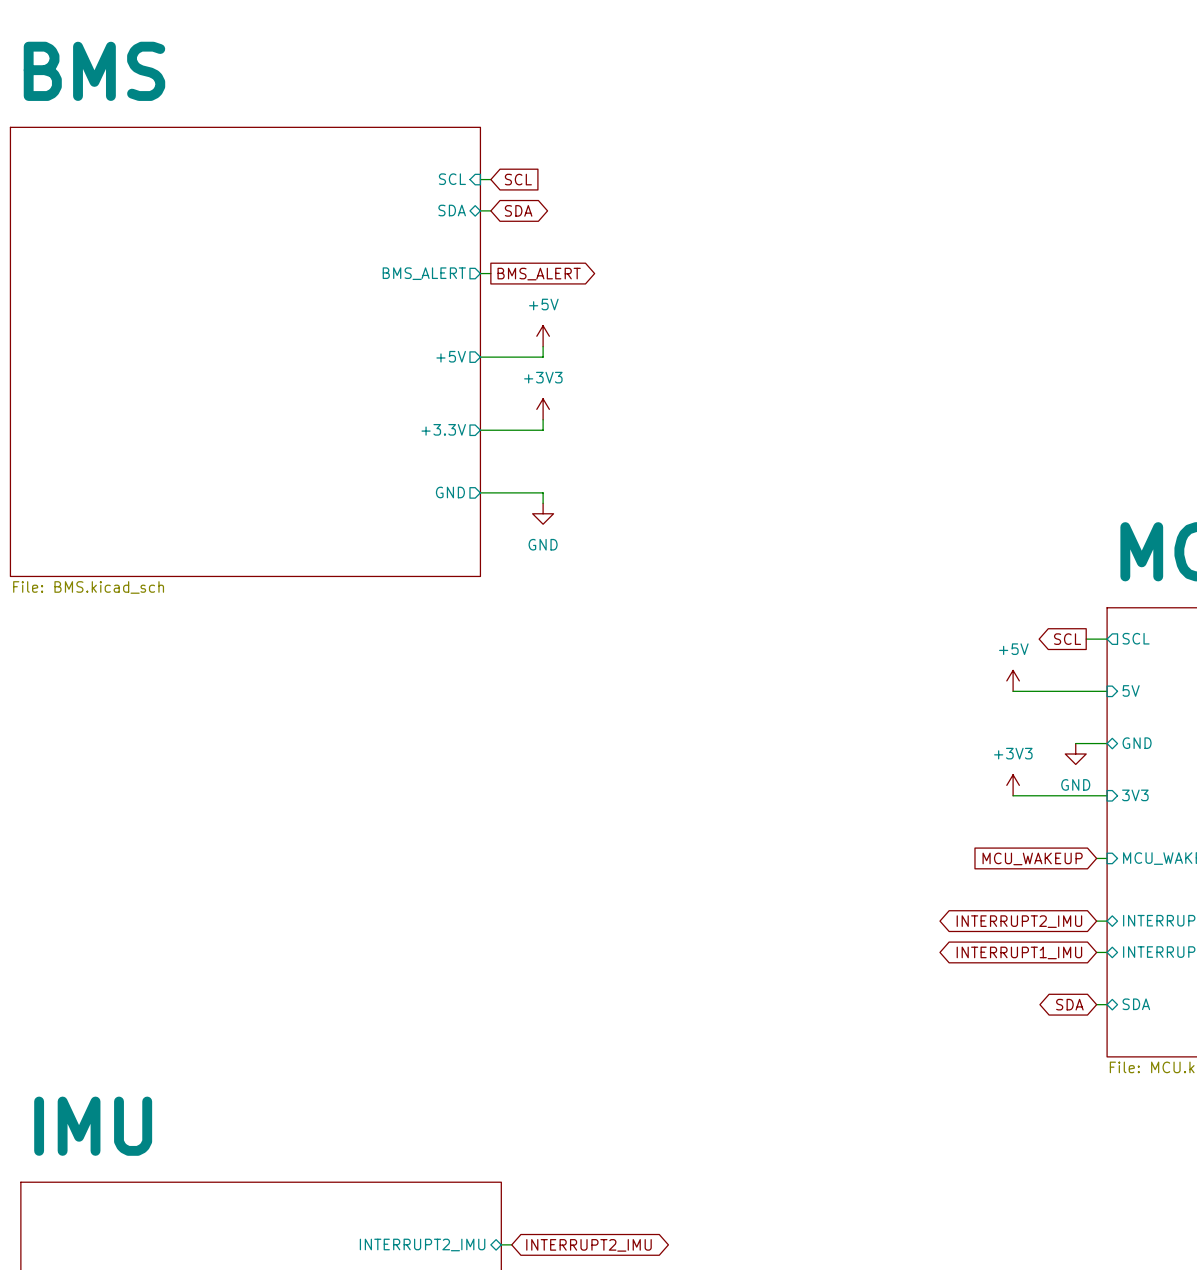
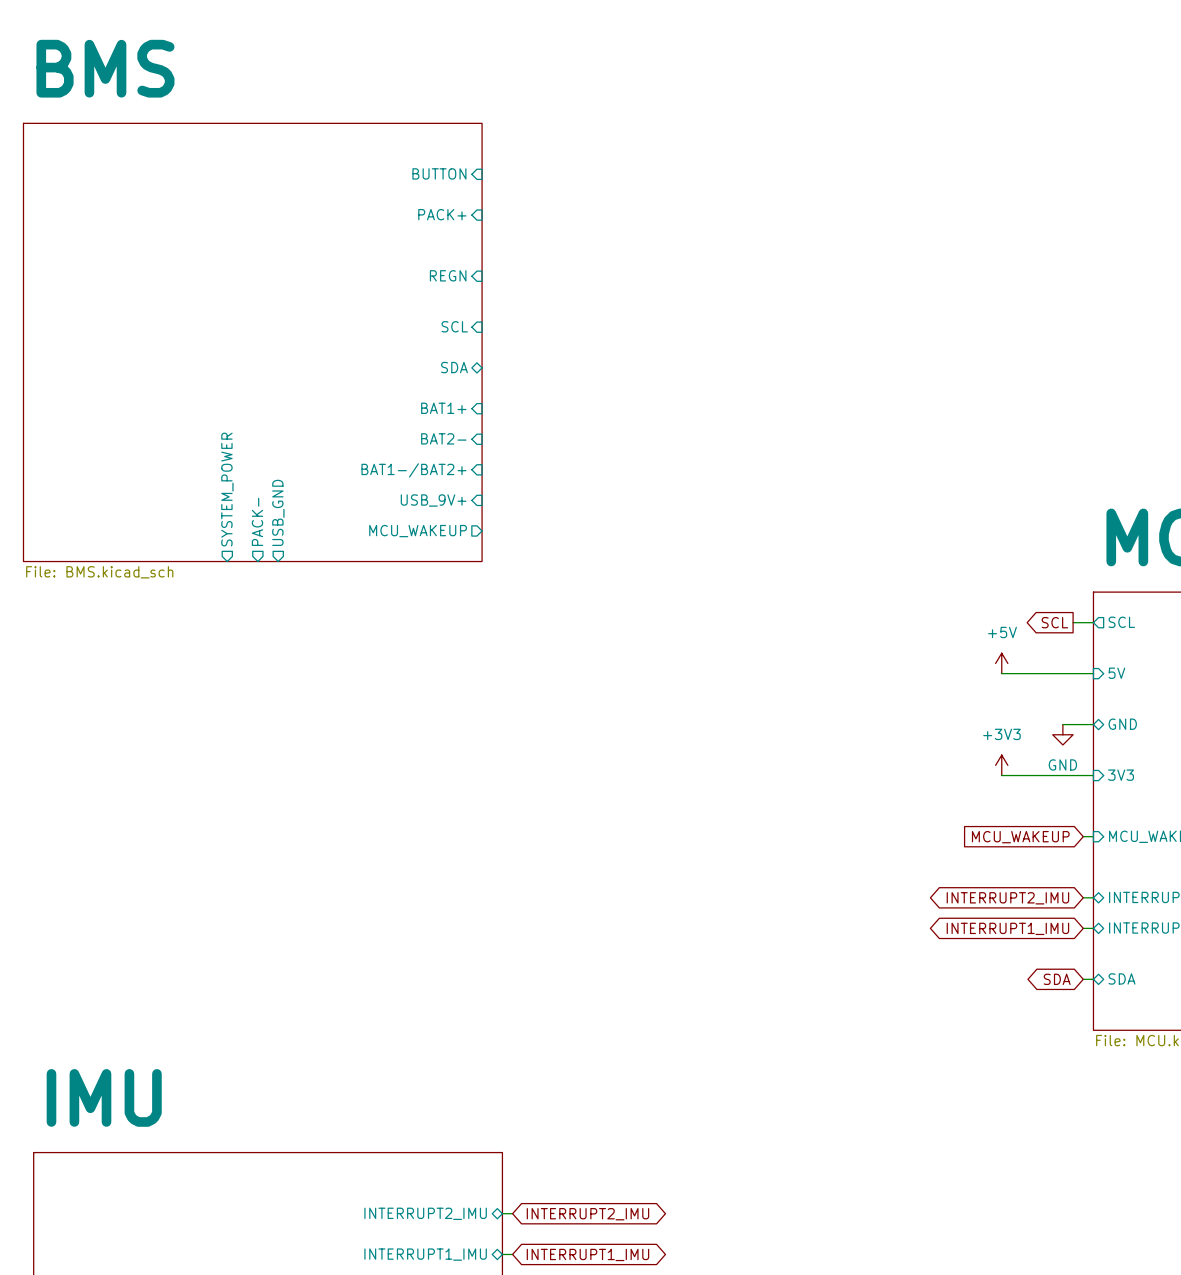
sheet pin: SCL (452, 179) -> BUTTON (439, 173)
wire: (480, 179) (490, 179) -> none
global label: SCL (518, 179) -> none
sheet pin position: SDA (452, 210) -> SDA (454, 367)
wire: (480, 210) (490, 210) -> none
global label: SDA (518, 210) -> none
sheet pin: none -> PACK+ (442, 214)
sheet pin: BMS_ALERT (424, 273) -> none
wire: (480, 273) (490, 273) -> none
global label: BMS_ALERT (539, 274) -> none
sheet pin: none -> REGN (448, 275)
sheet pin: none -> SCL (454, 326)
power symbol: +5V (543, 336) -> none
wire: (543, 346) (543, 357) (480, 357) -> none
sheet pin: +5V (451, 356) -> none
power symbol: +3V3 (543, 409) -> none
sheet pin: none -> BAT1+ (443, 408)
wire: (543, 419) (543, 430) (480, 430) -> none
sheet pin: +3.3V (443, 429) -> none
sheet pin: none -> BAT2- (443, 438)
sheet pin: none -> BAT1-/BAT2+ (413, 470)
sheet pin: GND (450, 492) -> none
wire: (480, 492) (543, 492) (543, 503) -> none
sheet pin: none -> SYSTEM_POWER (227, 489)
sheet pin: none -> USB_9V+ (433, 500)
power symbol: GND (543, 513) -> none
sheet pin: none -> USB_GND (278, 512)
sheet pin: none -> PACK- (257, 521)
sheet pin: none -> MCU_WAKEUP (418, 531)

